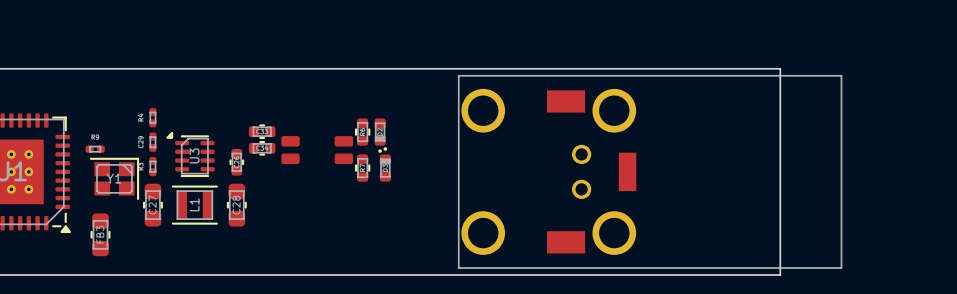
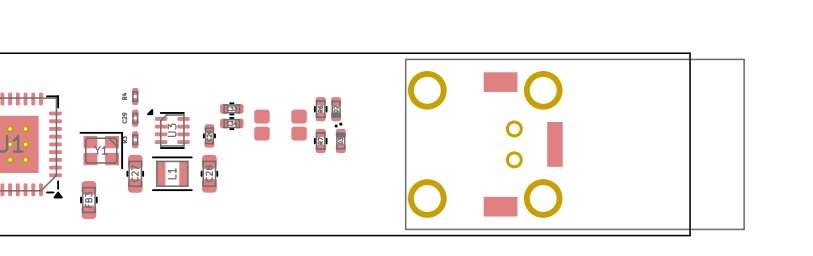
part footprint: [457, 74, 843, 269] -> [404, 58, 745, 231]
part footprint: [281, 136, 354, 165] -> [254, 109, 307, 141]
part: (95, 149) -> none

